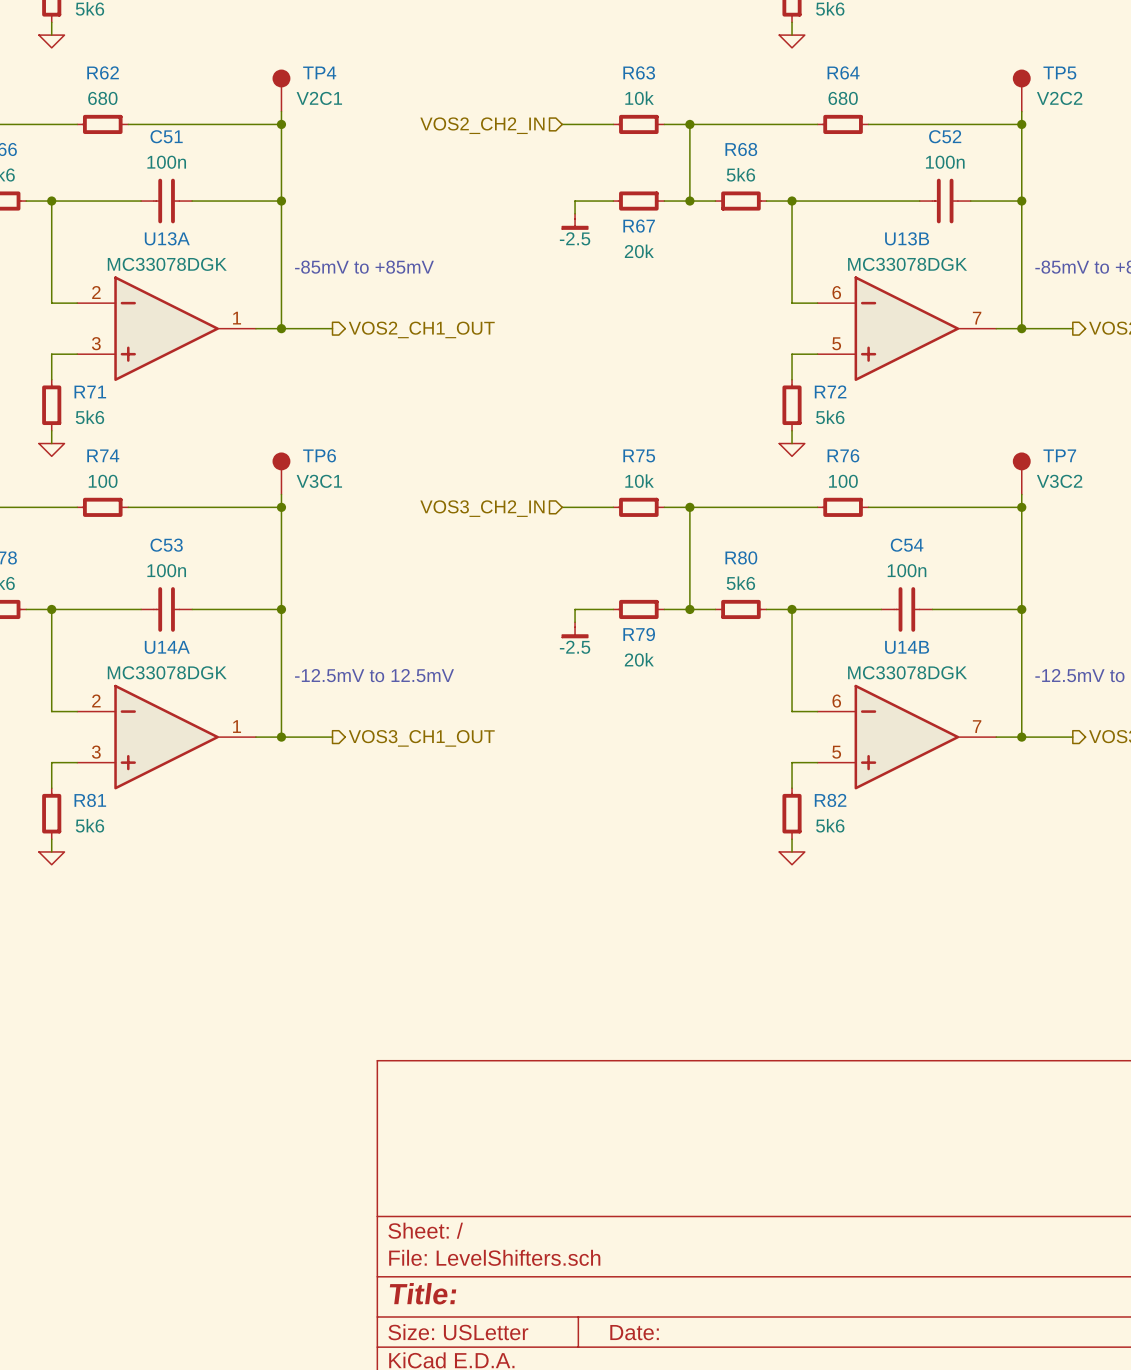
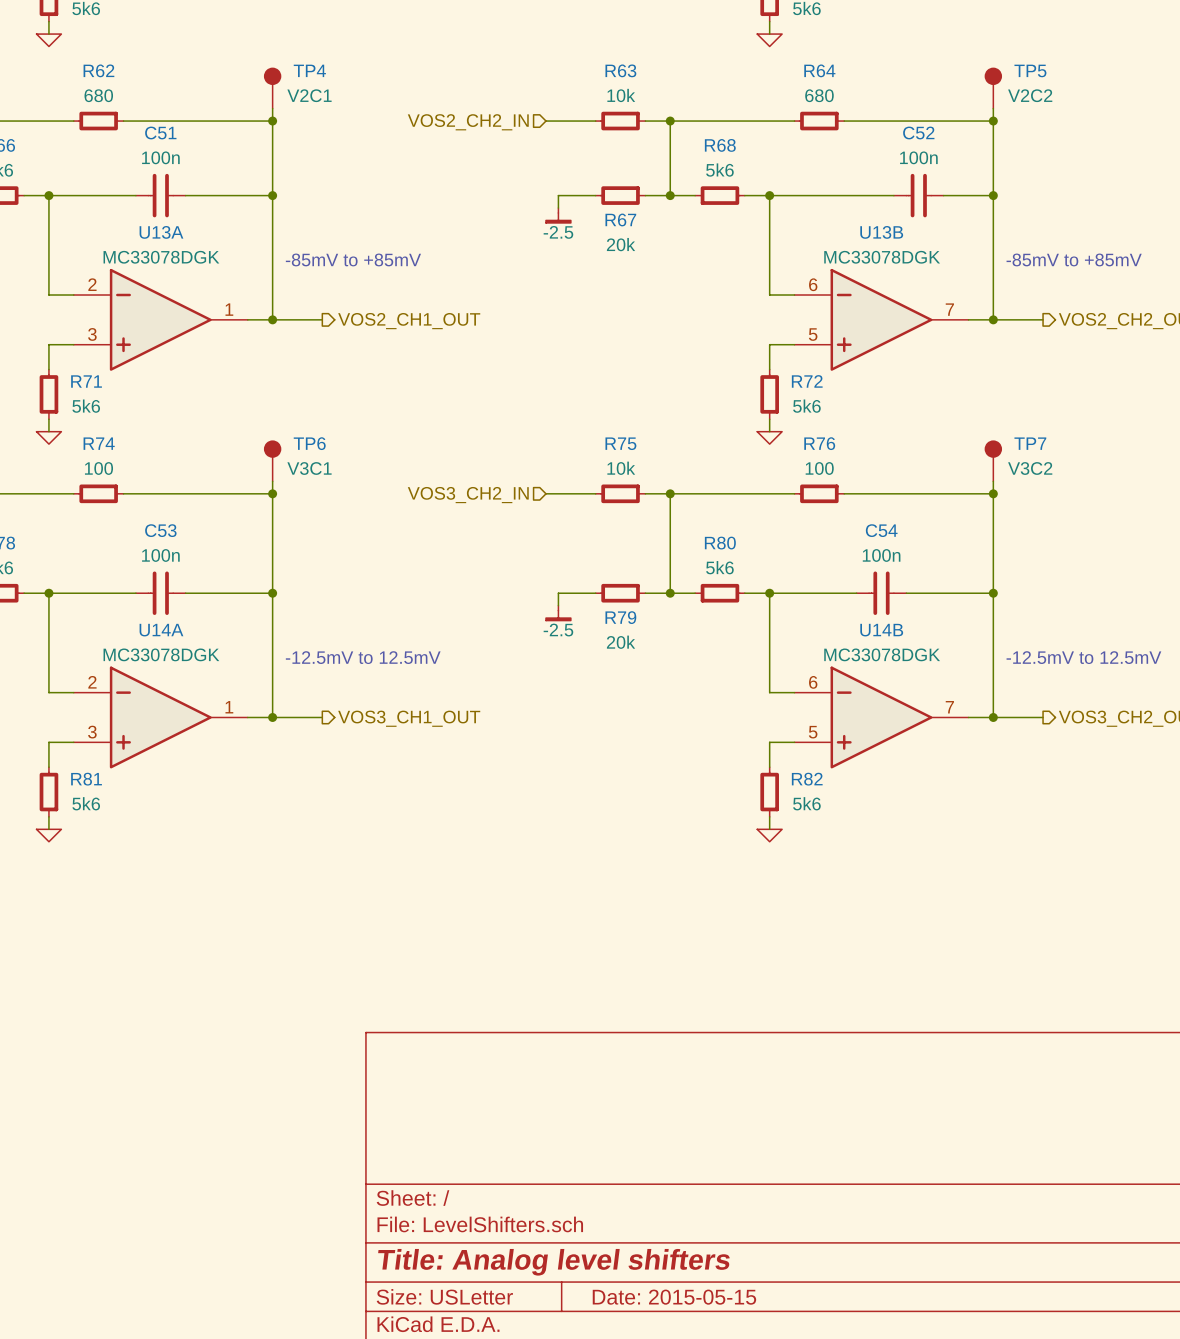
title block: Title: (423, 1293) -> Title: Analog level shifters (553, 1262)
title block: Date: (634, 1332) -> Date: 2015-05-15 (674, 1297)

